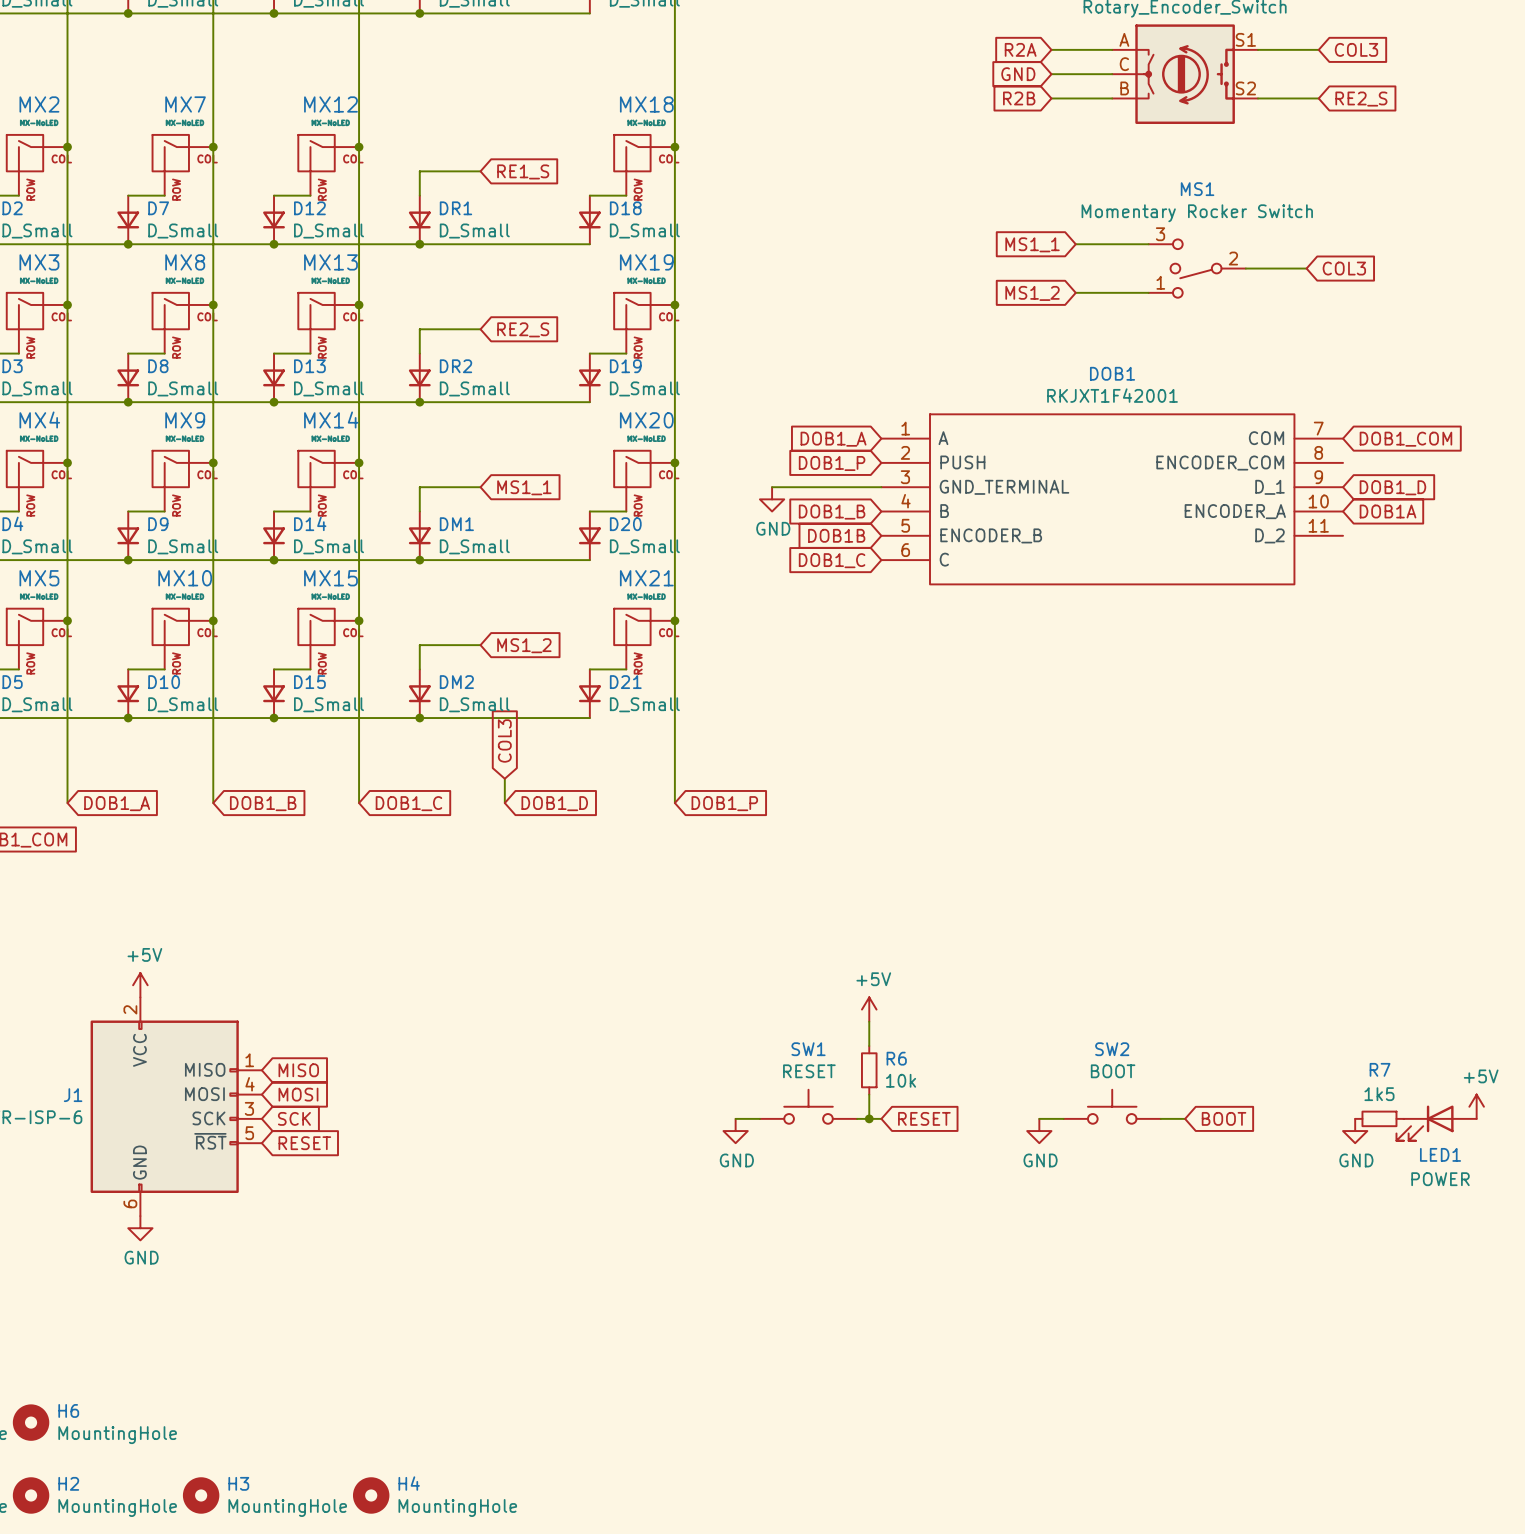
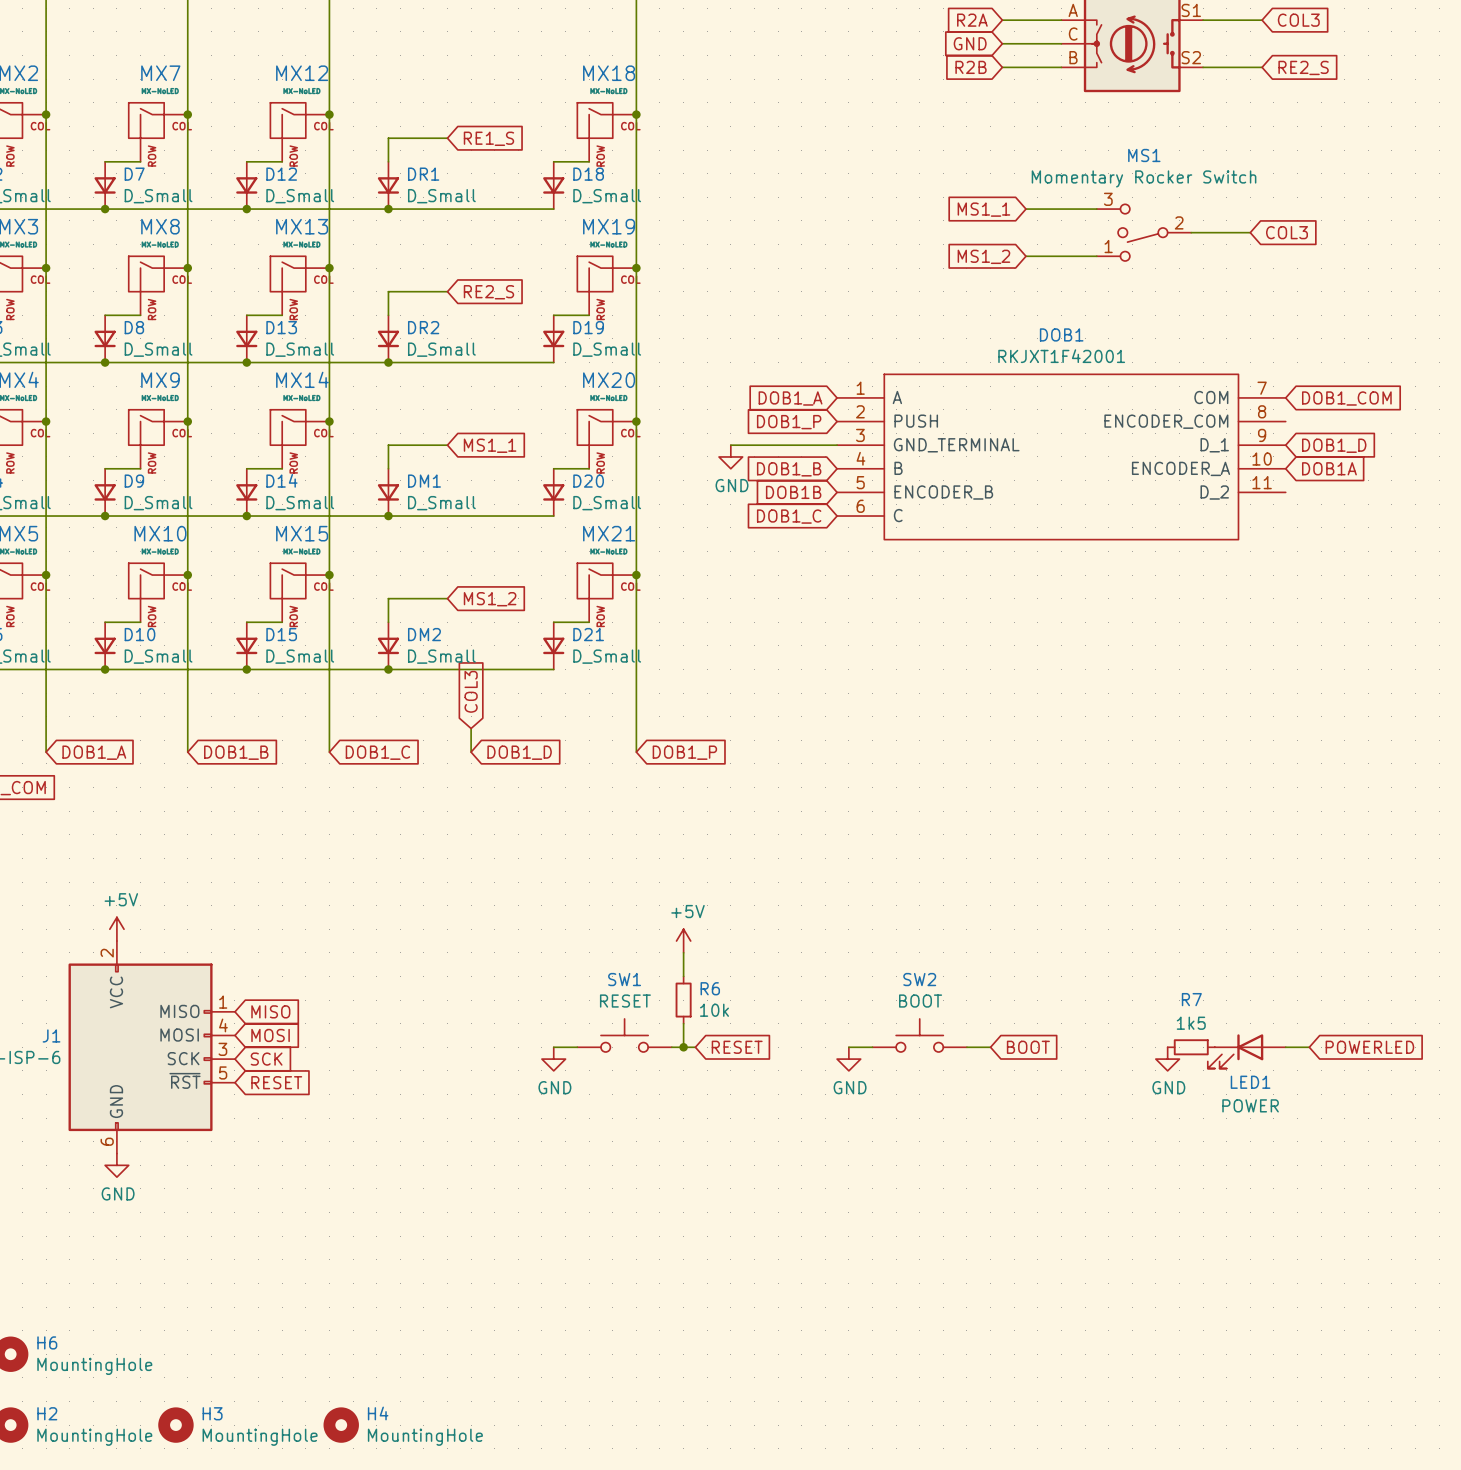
power symbol position: +5V (869, 1009) -> +5V (683, 941)
wire: (869, 1021) (869, 1046) -> (683, 952) (683, 976)
R6 position: (869, 1070) -> (683, 1000)
wire: (869, 1094) (869, 1118) -> (683, 1023) (683, 1047)
junction: none -> (683, 1047)
SW1 position: (808, 1106) -> (624, 1035)
SW2 position: (1112, 1106) -> (919, 1035)
wire: none -> (1285, 1047) (1309, 1047)
global label: none -> POWERLED (1369, 1047)
power symbol: +5V (1476, 1106) -> none
power symbol: none -> GND (553, 1059)
wire: (735, 1118) (759, 1118) -> (553, 1047) (577, 1047)
wire: (857, 1118) (881, 1118) -> (671, 1047) (695, 1047)
junction: (869, 1118) -> none
power symbol: none -> GND (848, 1059)
global label position: RESET (924, 1118) -> RESET (737, 1047)
wire: (1160, 1118) (1185, 1118) -> (966, 1047) (990, 1047)
power symbol: none -> GND (1167, 1059)
global label position: BOOT (1224, 1118) -> BOOT (1028, 1047)
R7 position: (1379, 1118) -> (1191, 1047)
LED1 position: (1436, 1123) -> (1246, 1051)
power symbol: GND (735, 1131) -> none
power symbol: GND (1039, 1131) -> none
power symbol: GND (1355, 1131) -> none

